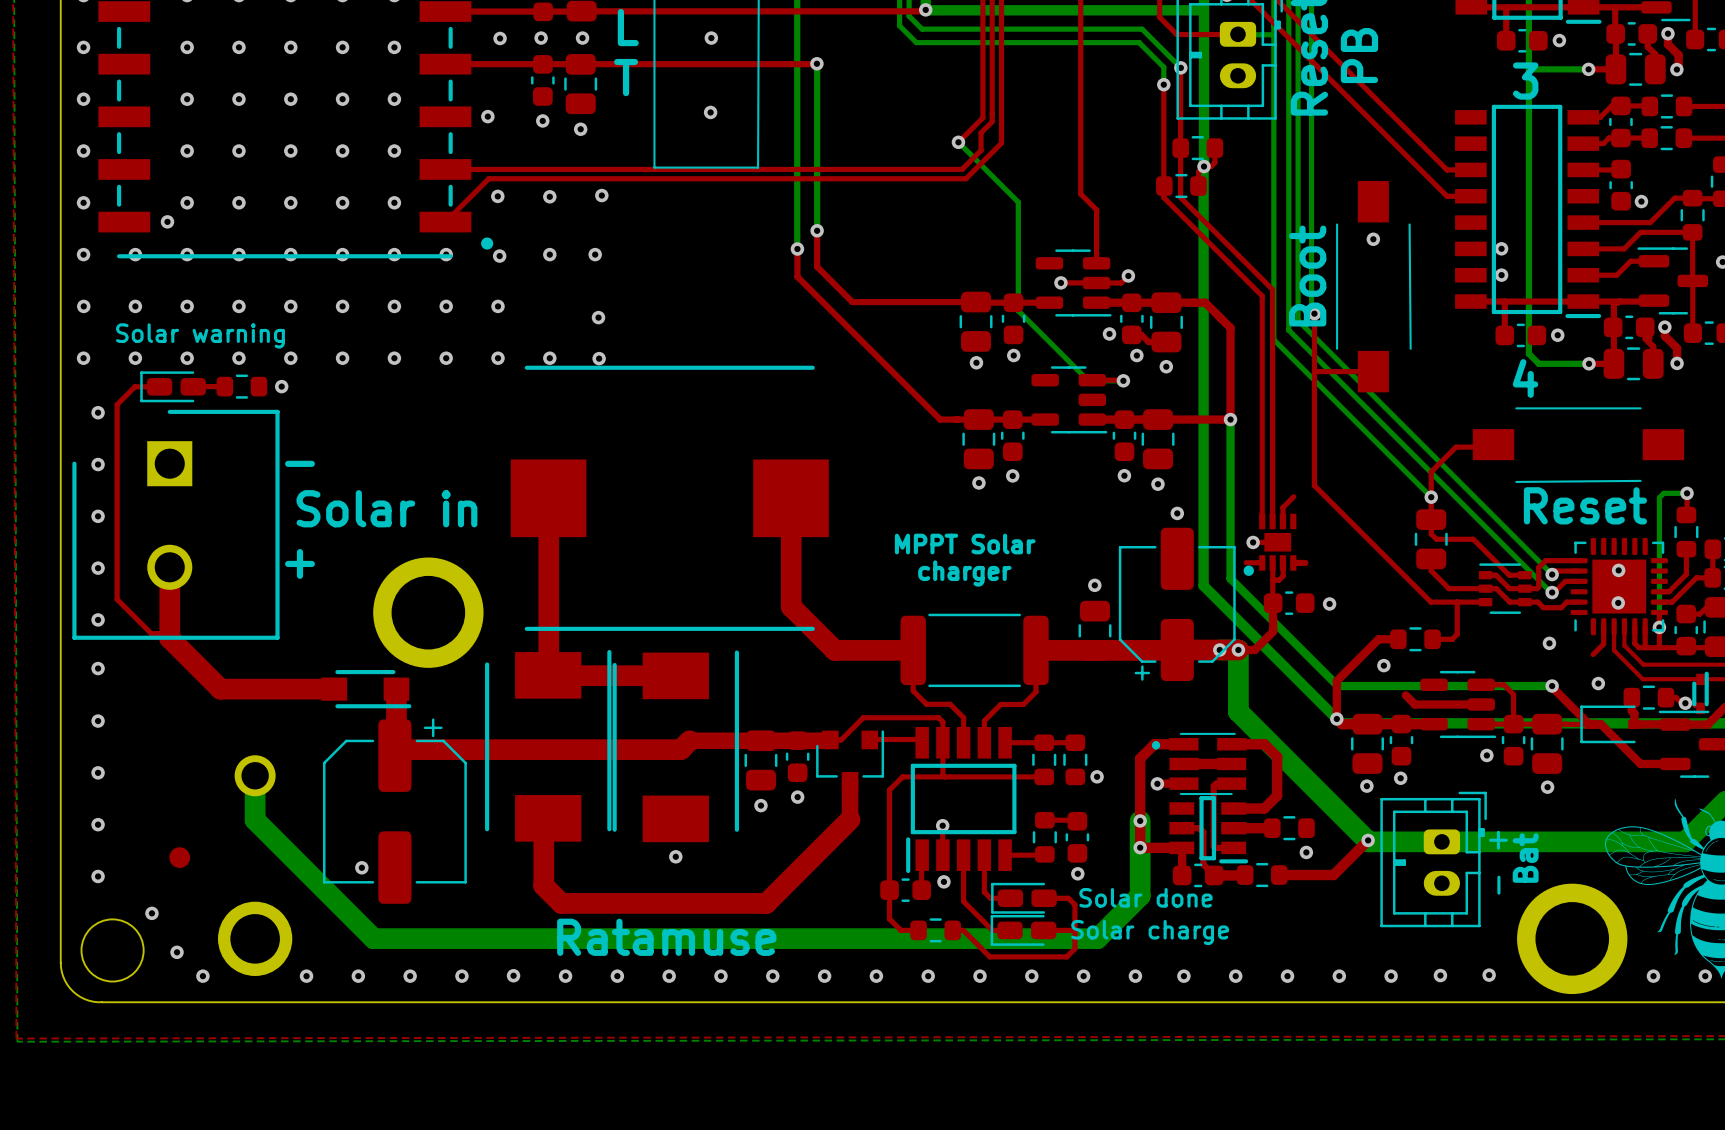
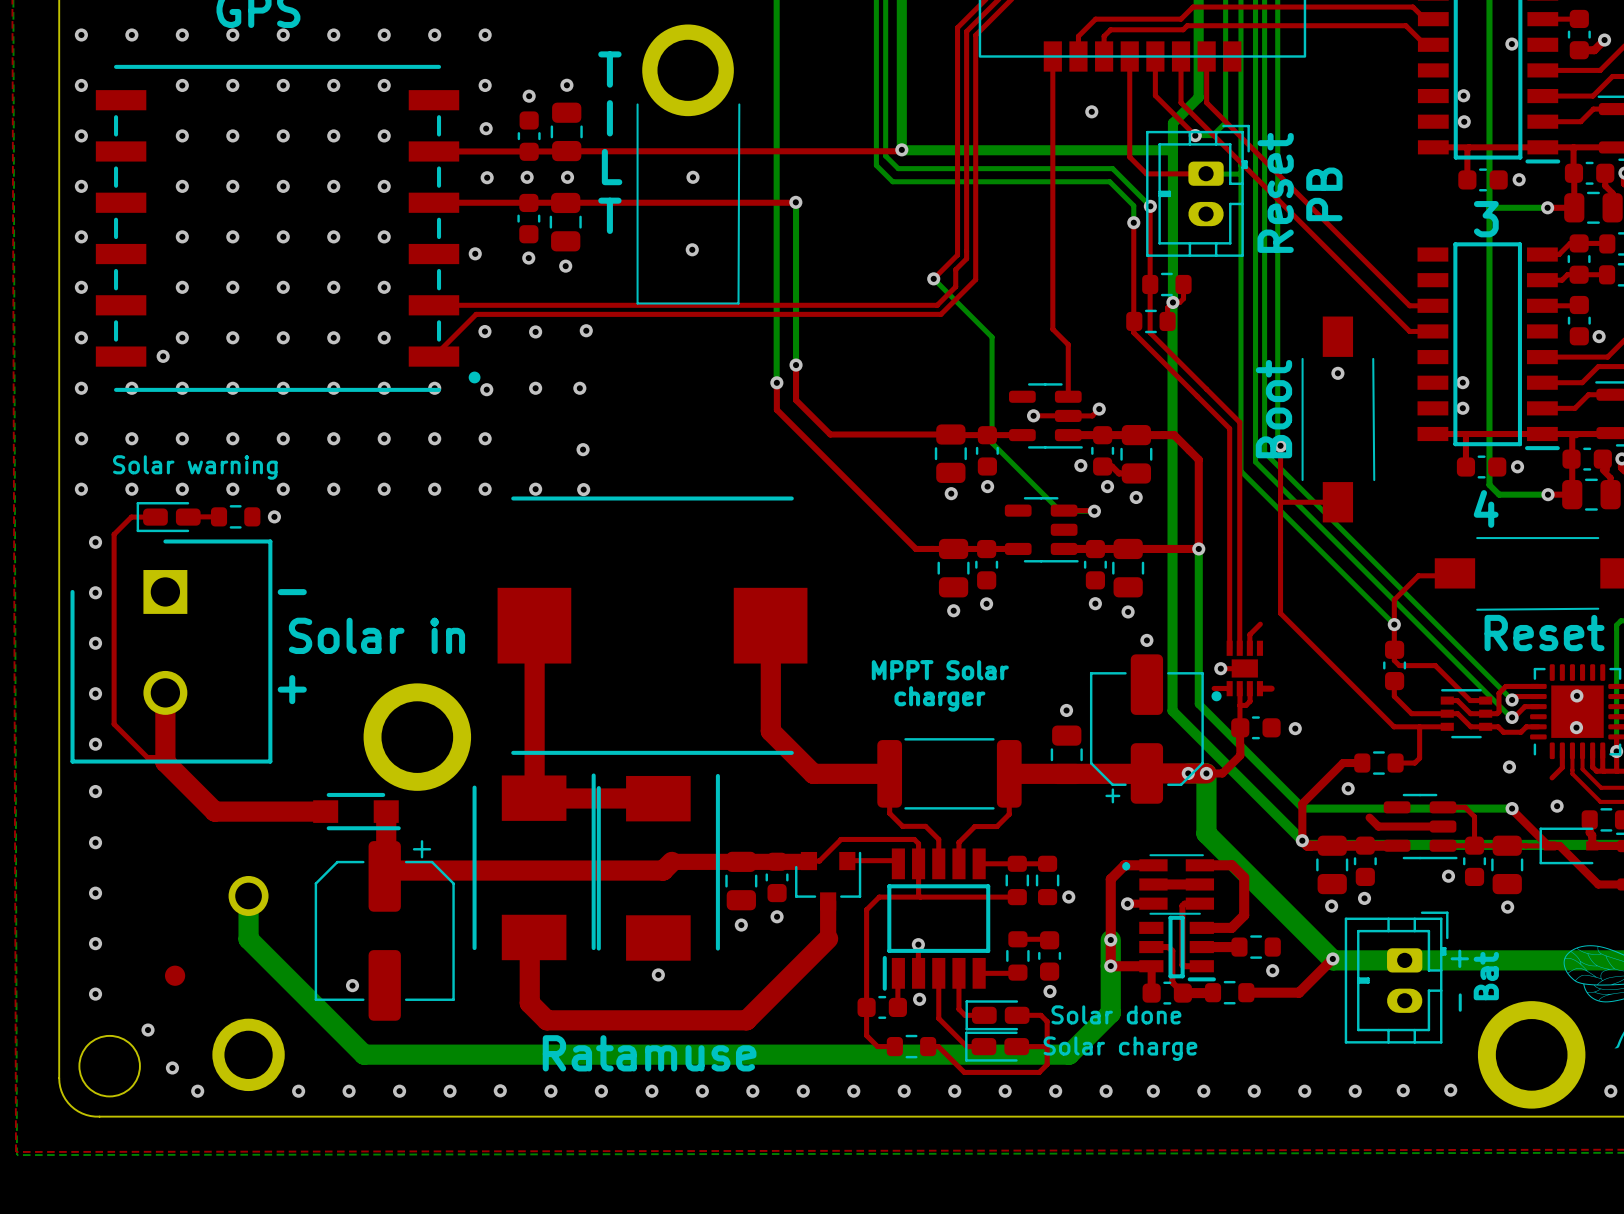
part footprint: [1414, 509, 1448, 570] -> [1383, 640, 1407, 691]

